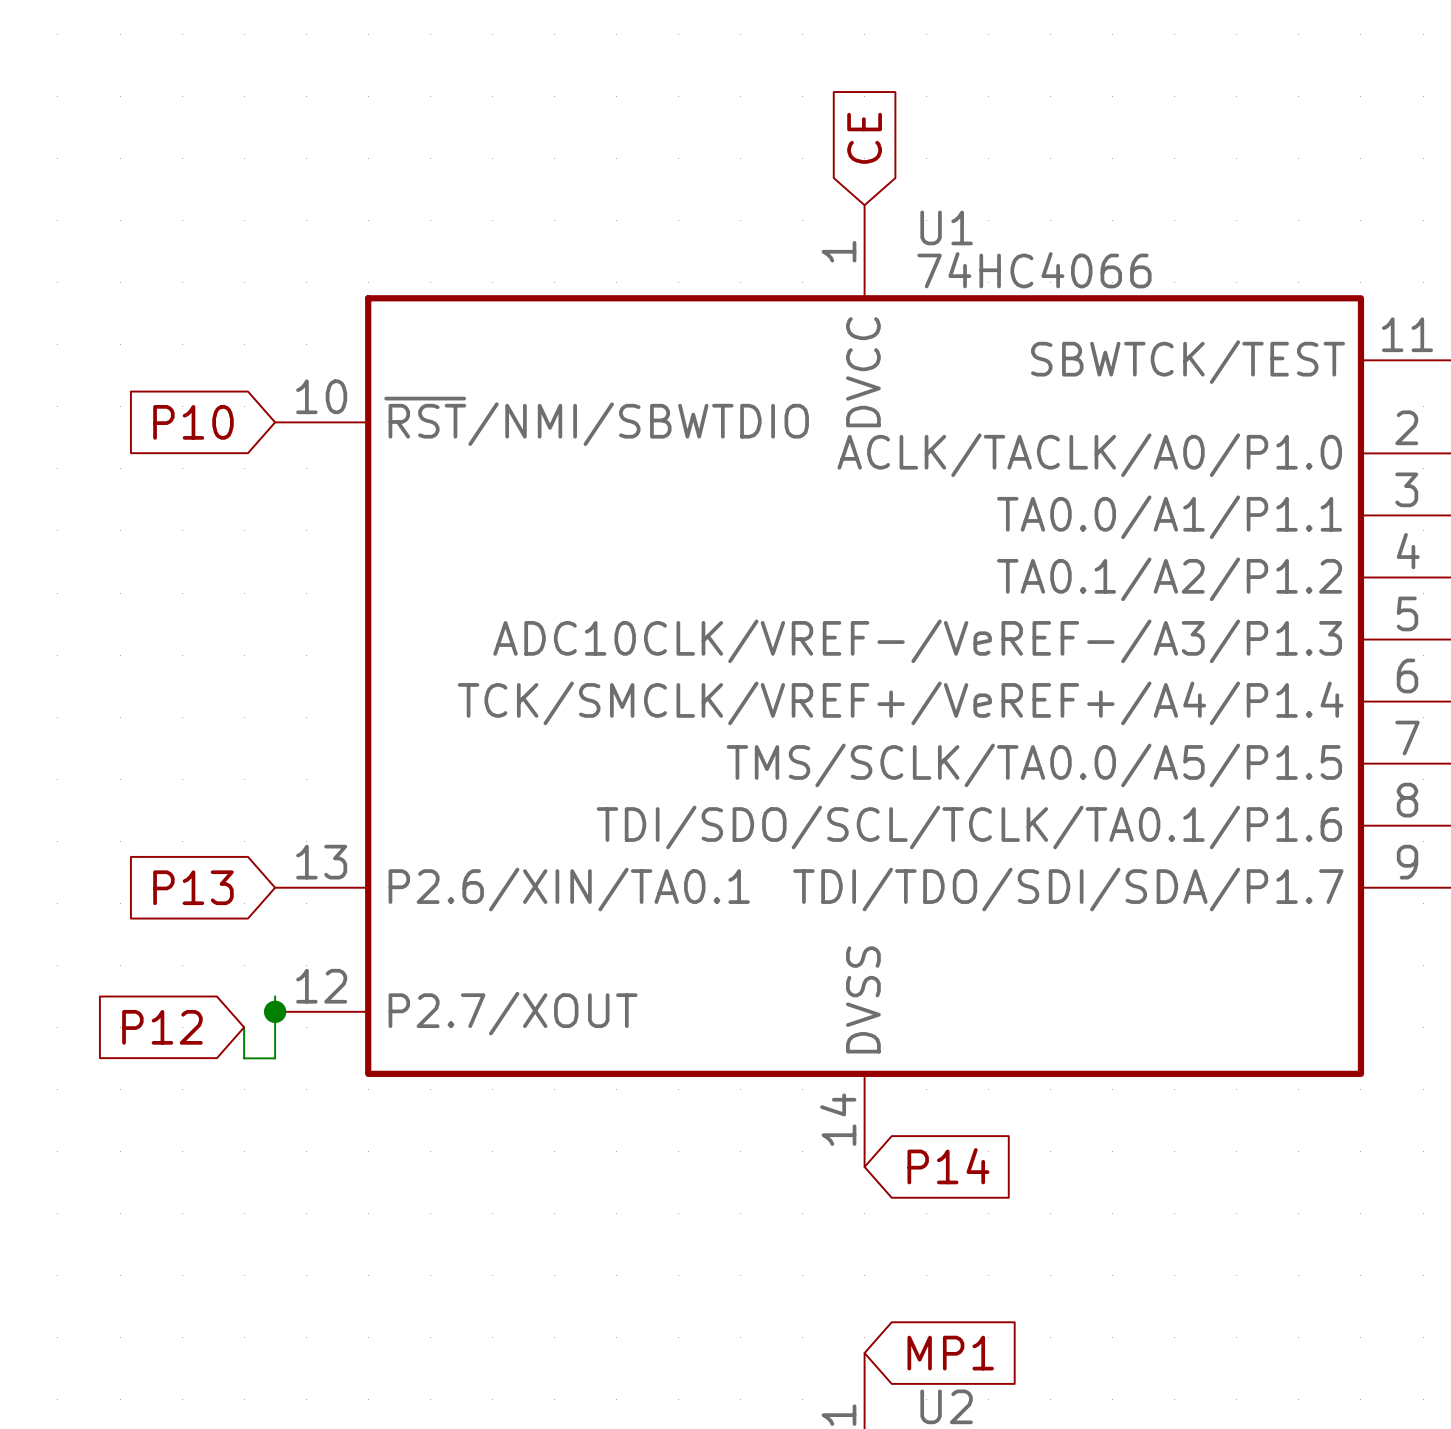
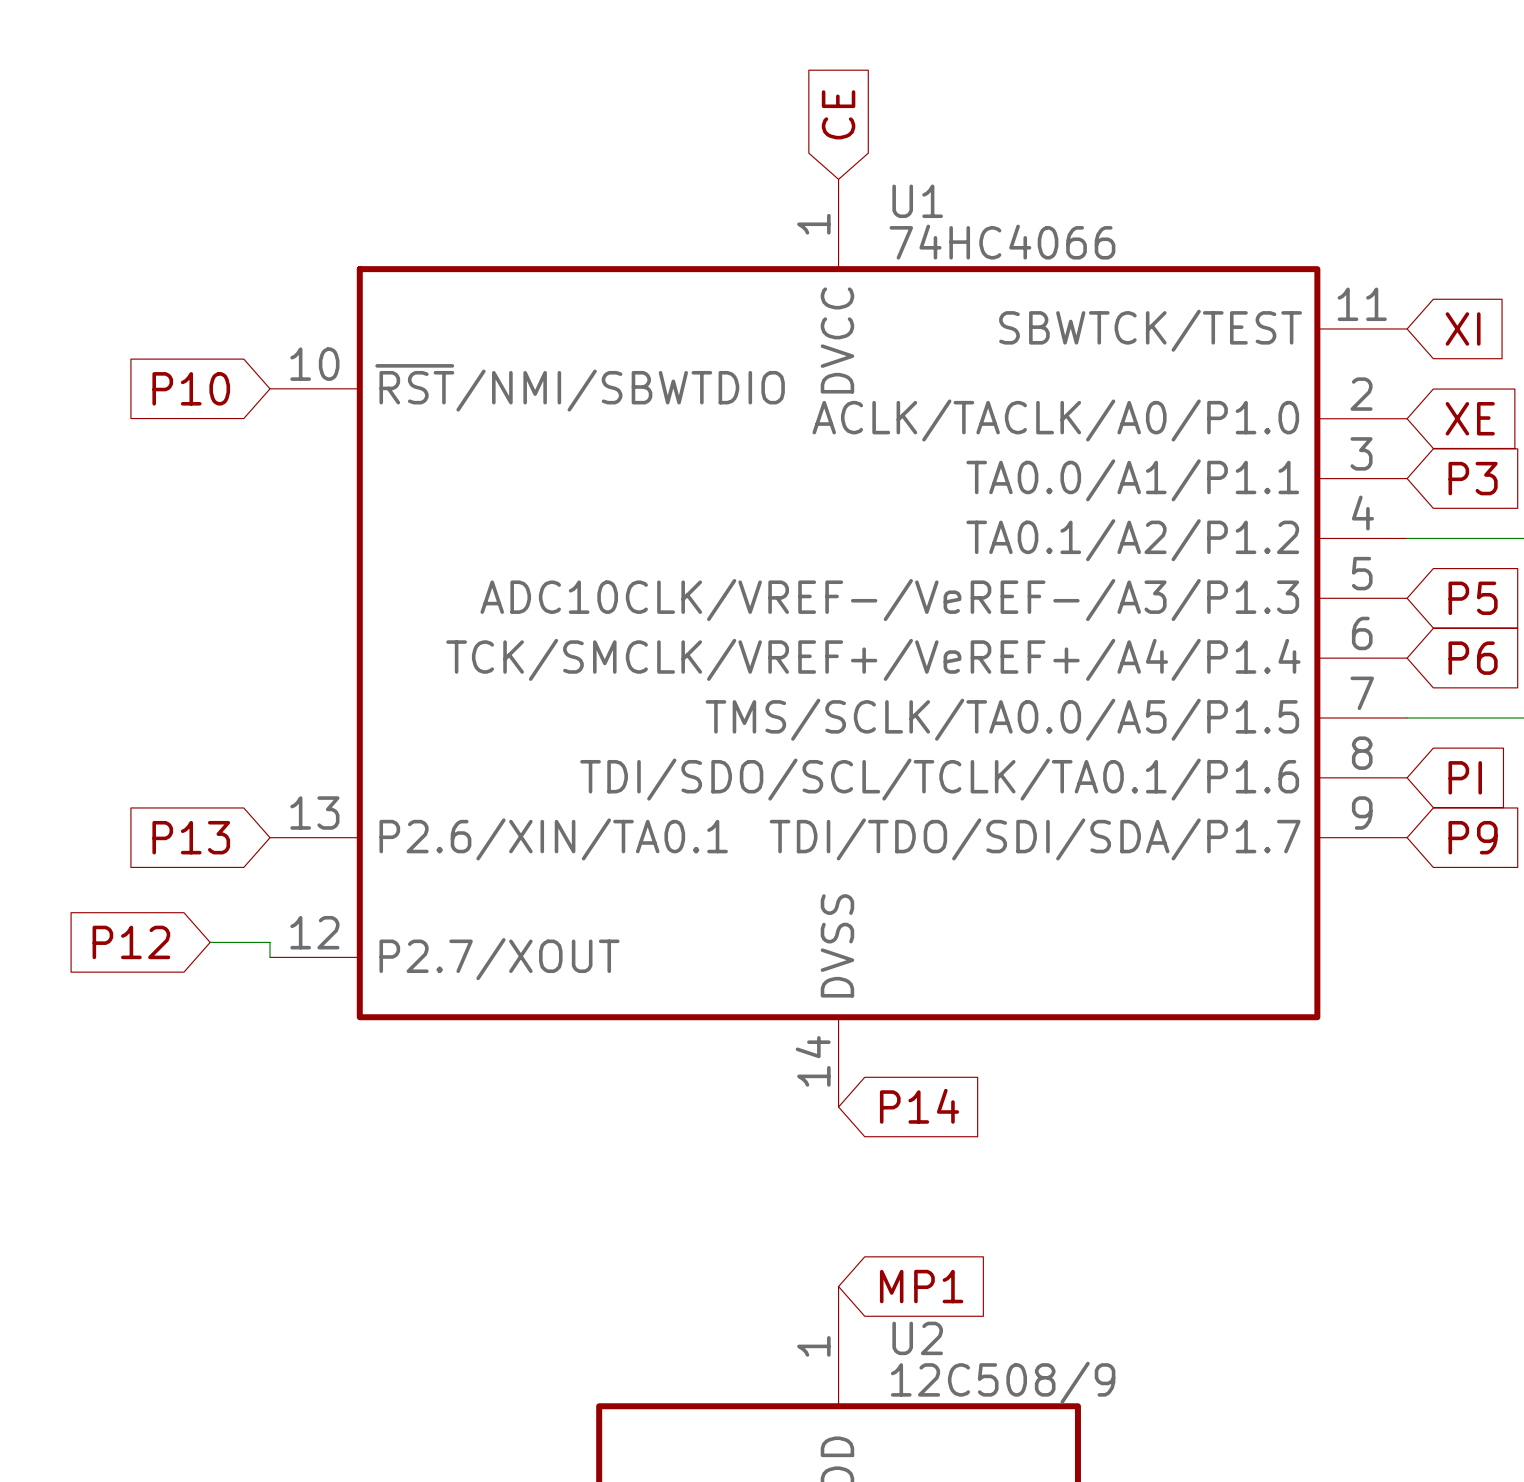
wire: none -> (210, 942) (270, 942)
wire: (275, 1011) (275, 1058) (244, 1058) (244, 1027) -> none
junction: (275, 1011) -> none
global label position: P12 (162, 1027) -> P12 (131, 942)

